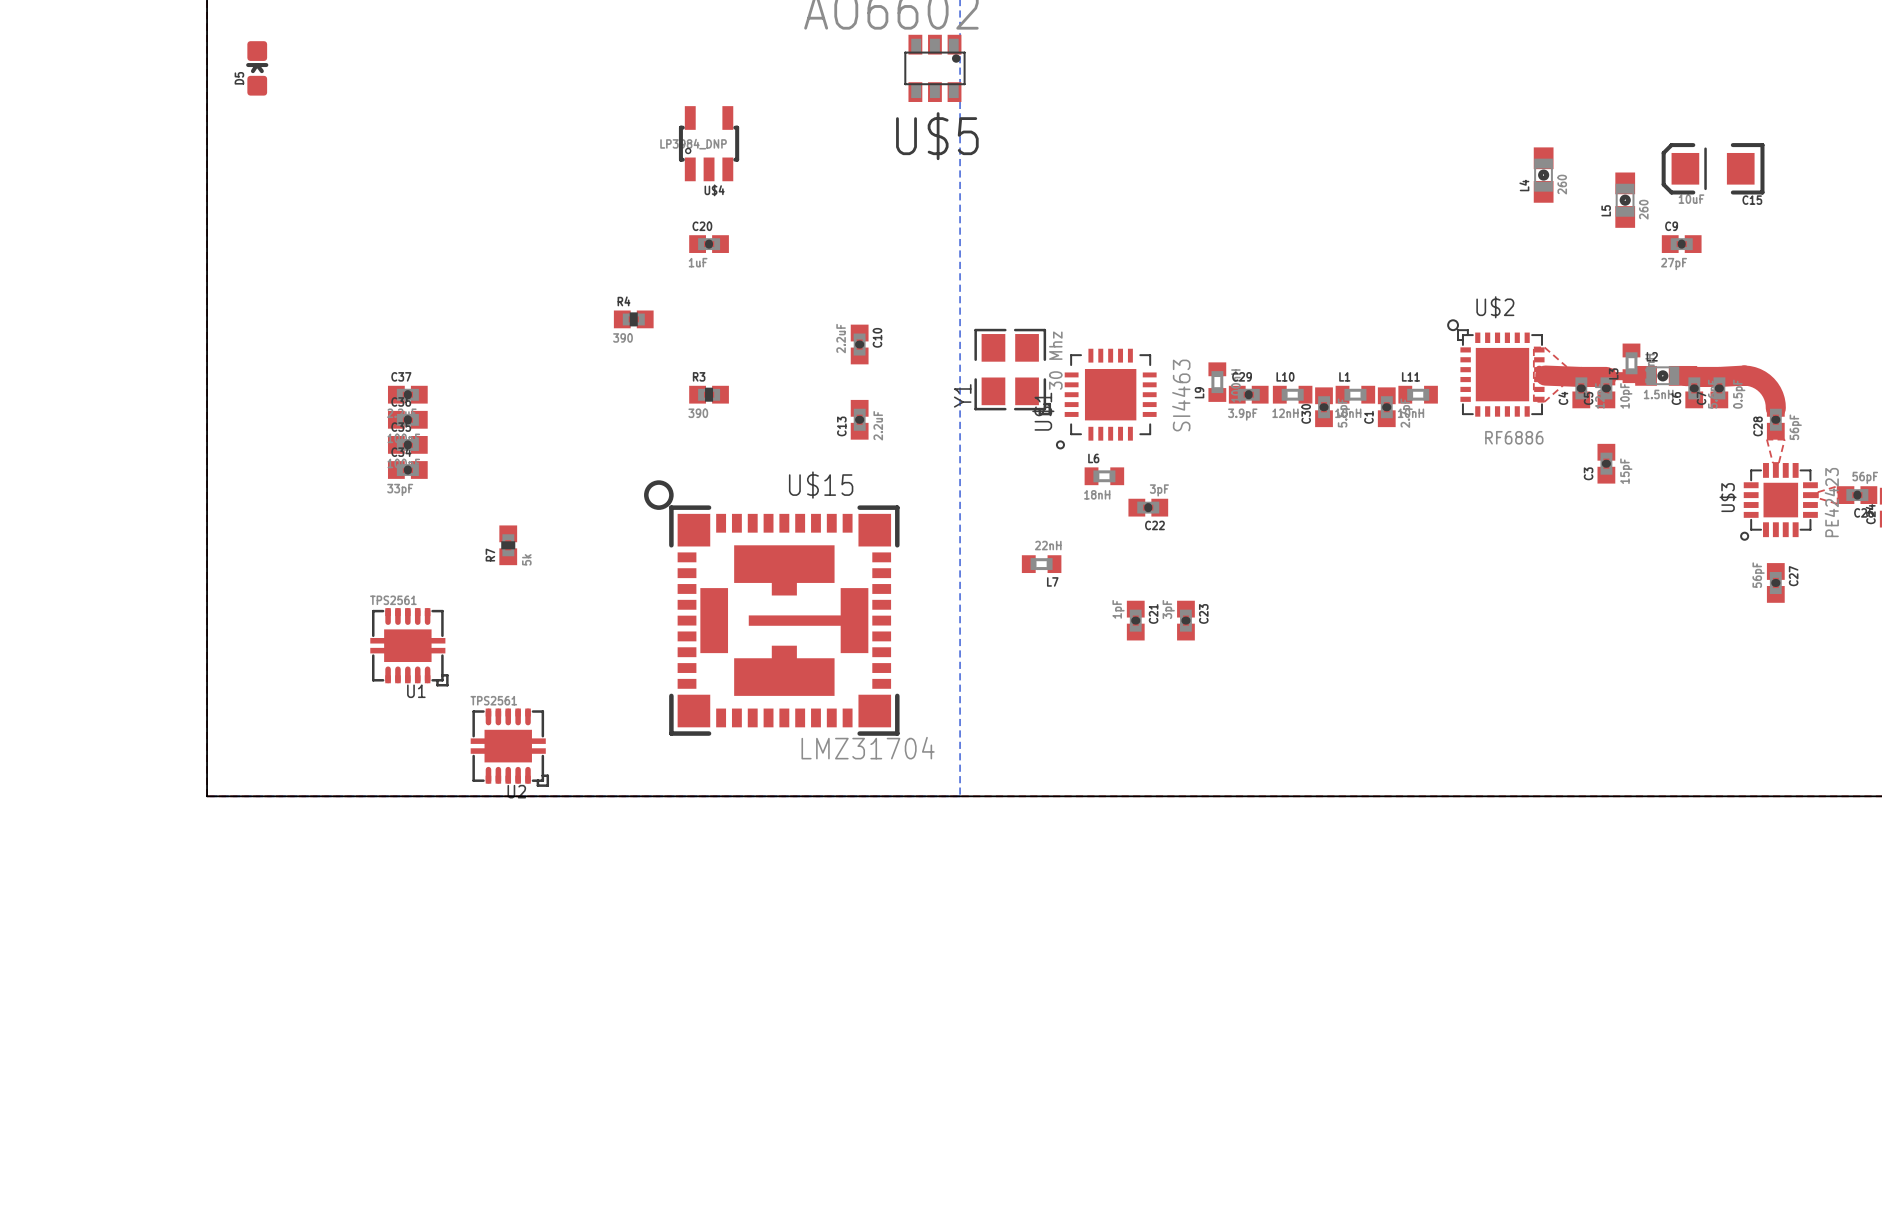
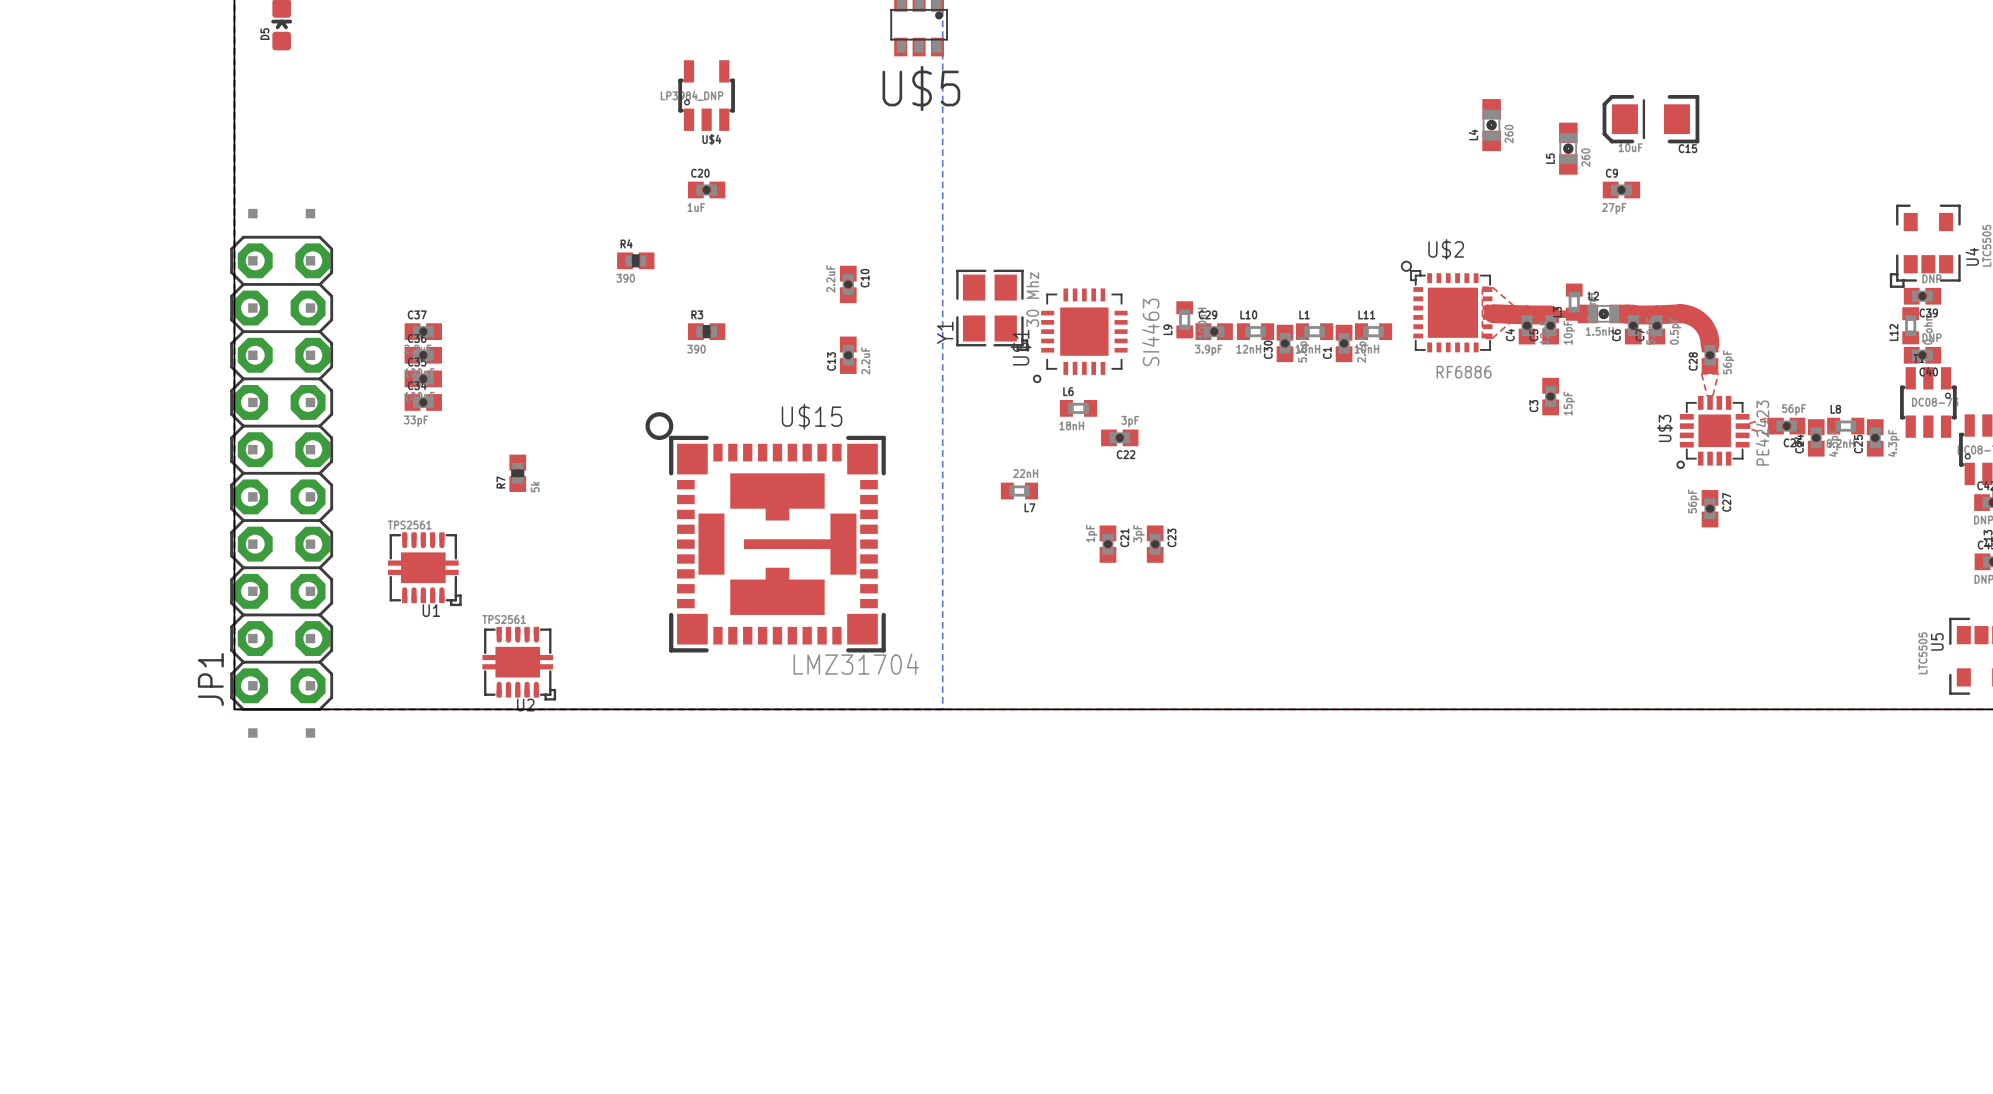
JP1: none -> (281, 473)

